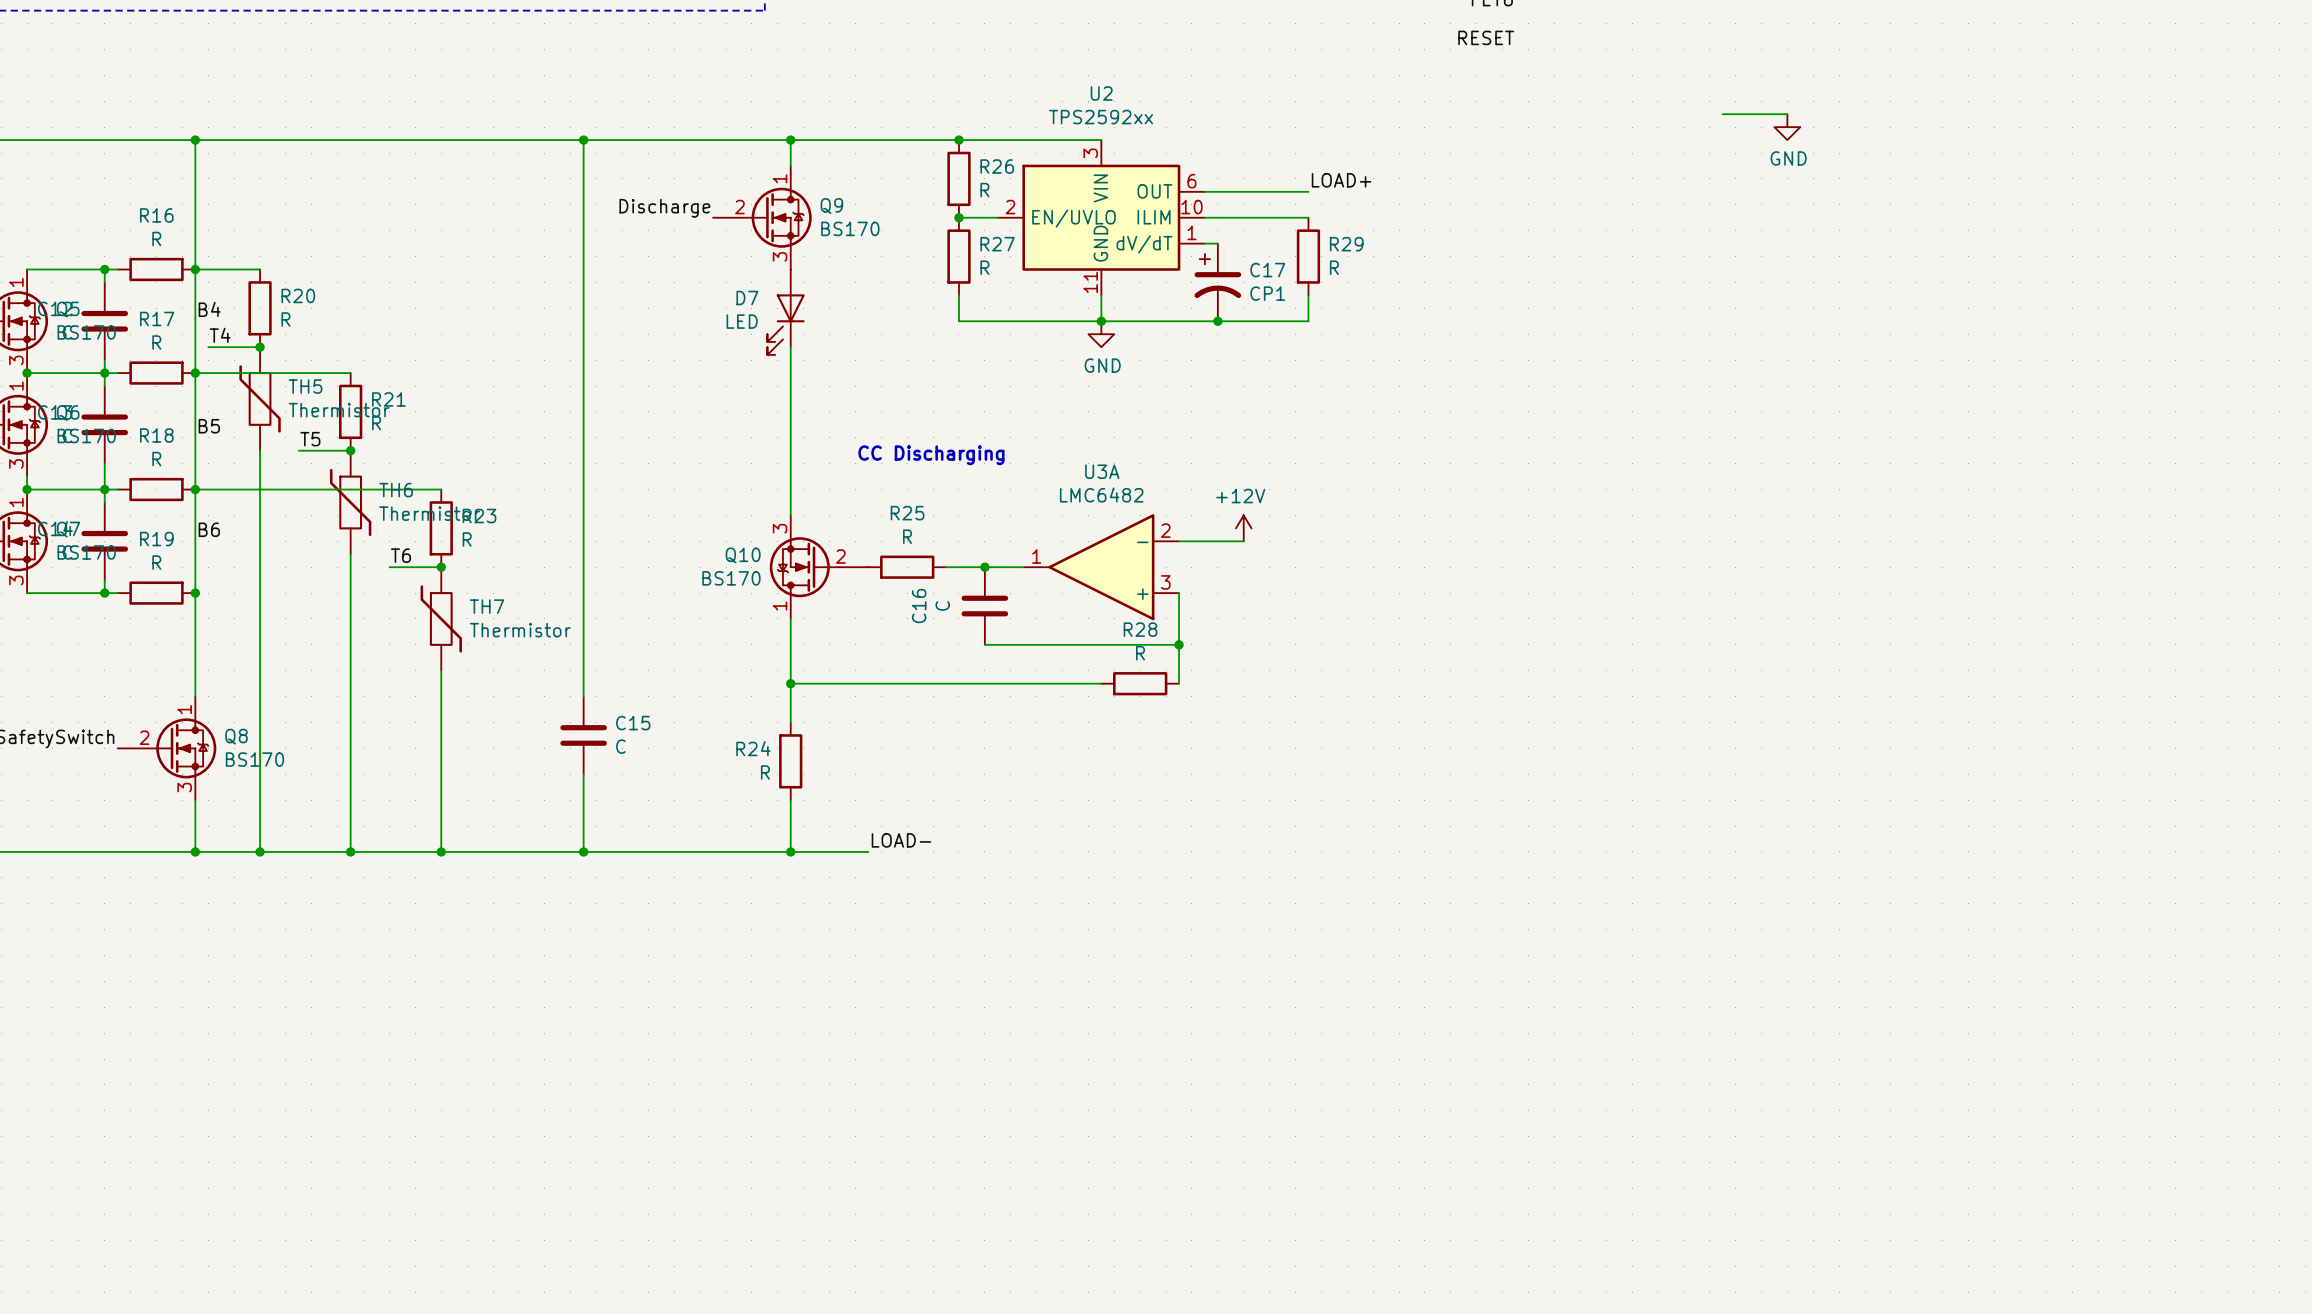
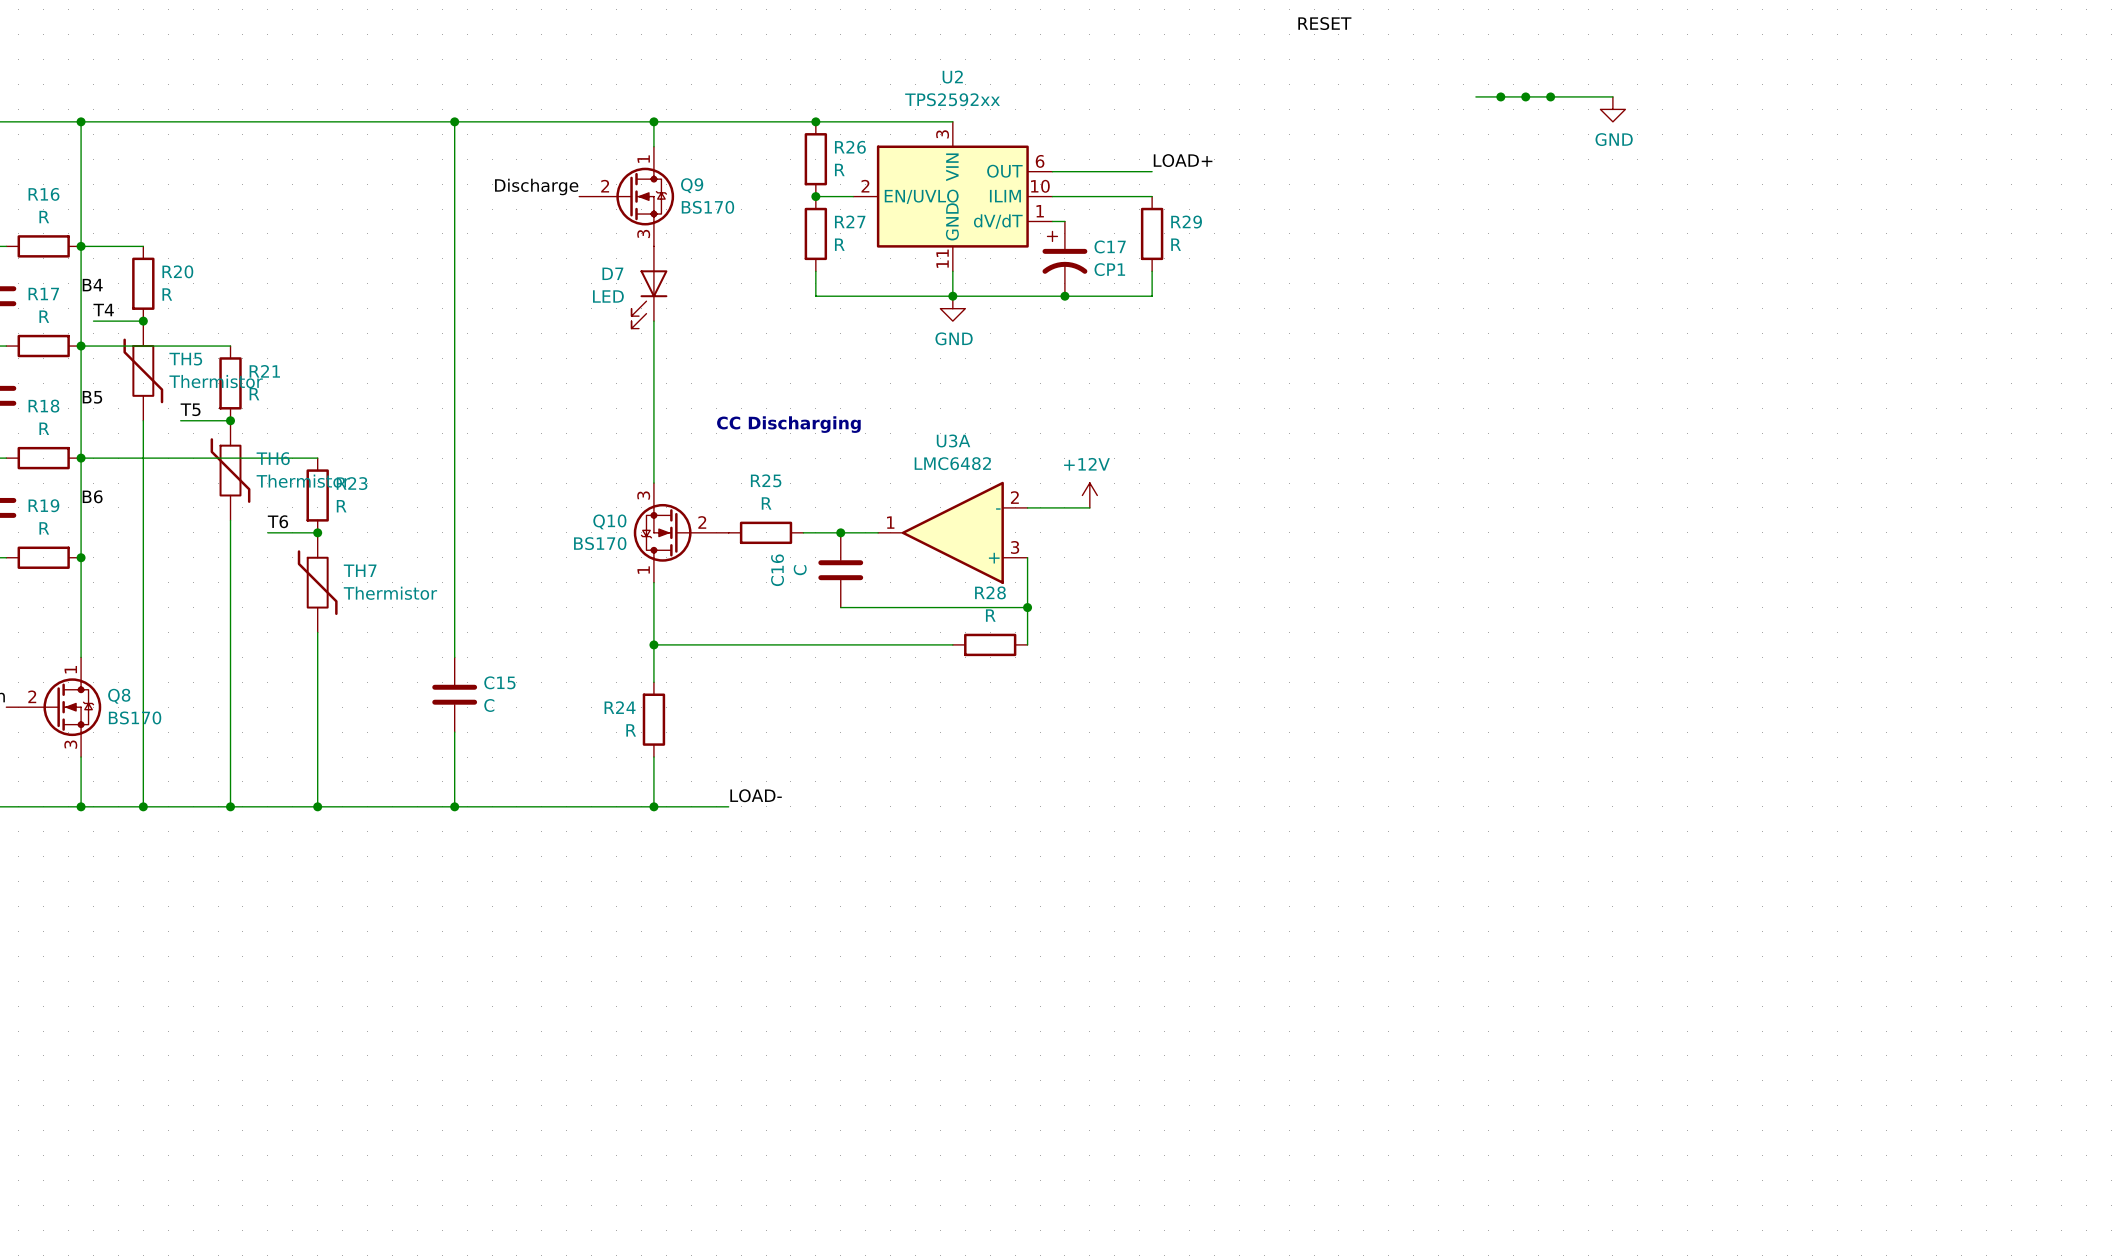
wire: none -> (1475, 96) (1550, 96)
junction: none -> (1500, 96)
junction: none -> (1525, 96)
junction: none -> (1550, 96)

